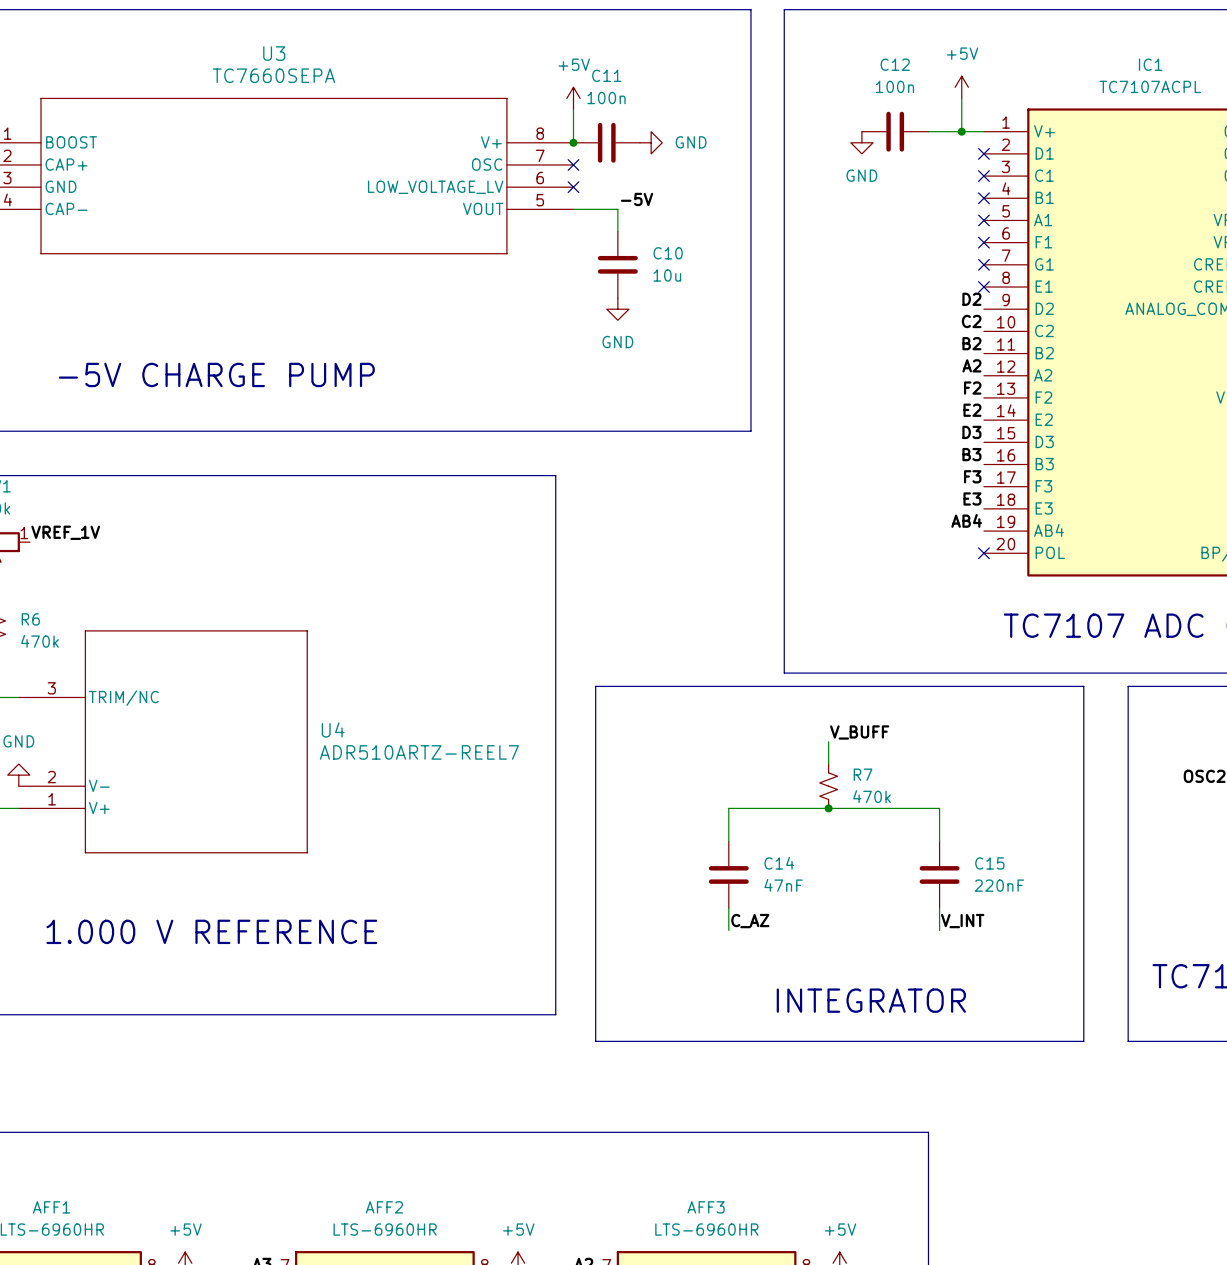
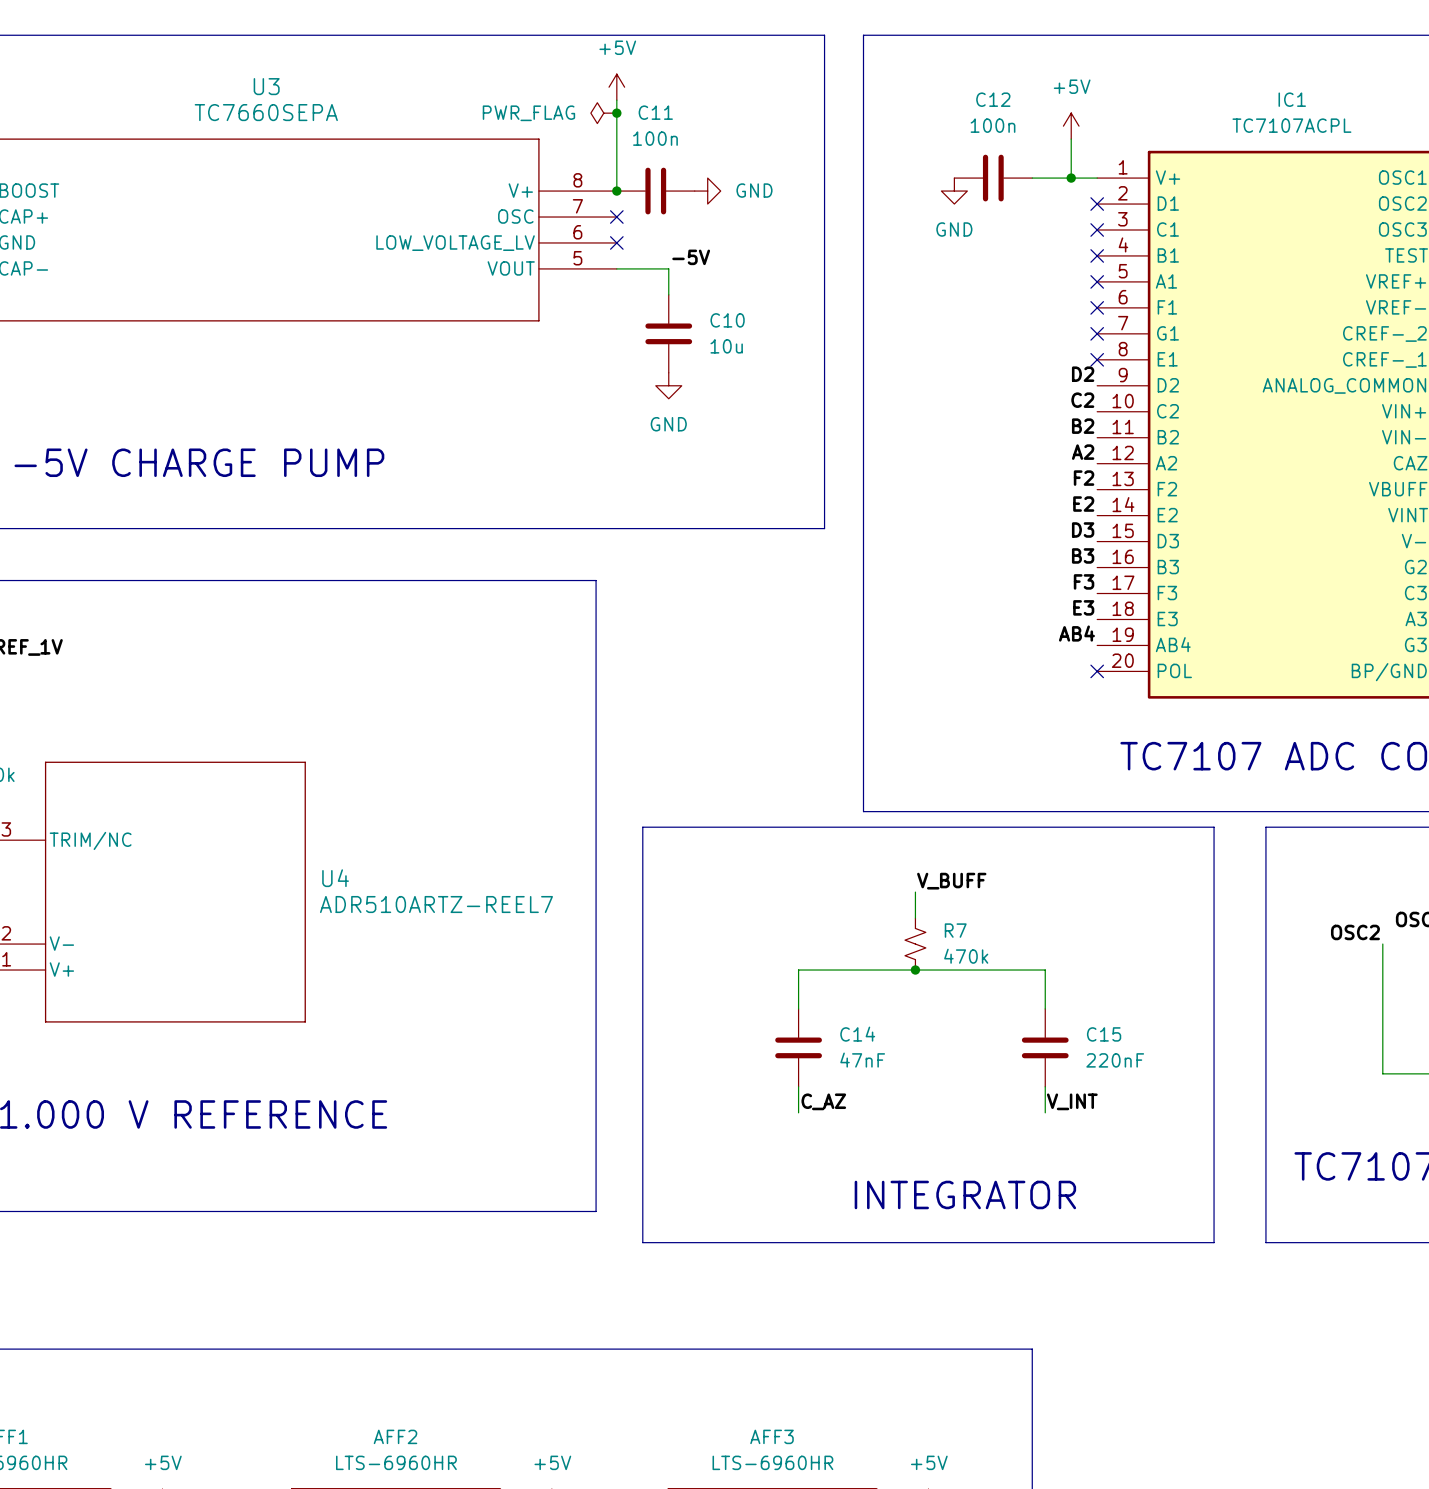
power symbol: none -> PWR_FLAG (603, 113)
junction: none -> (616, 113)
power symbol position: +5V (573, 98) -> +5V (616, 87)

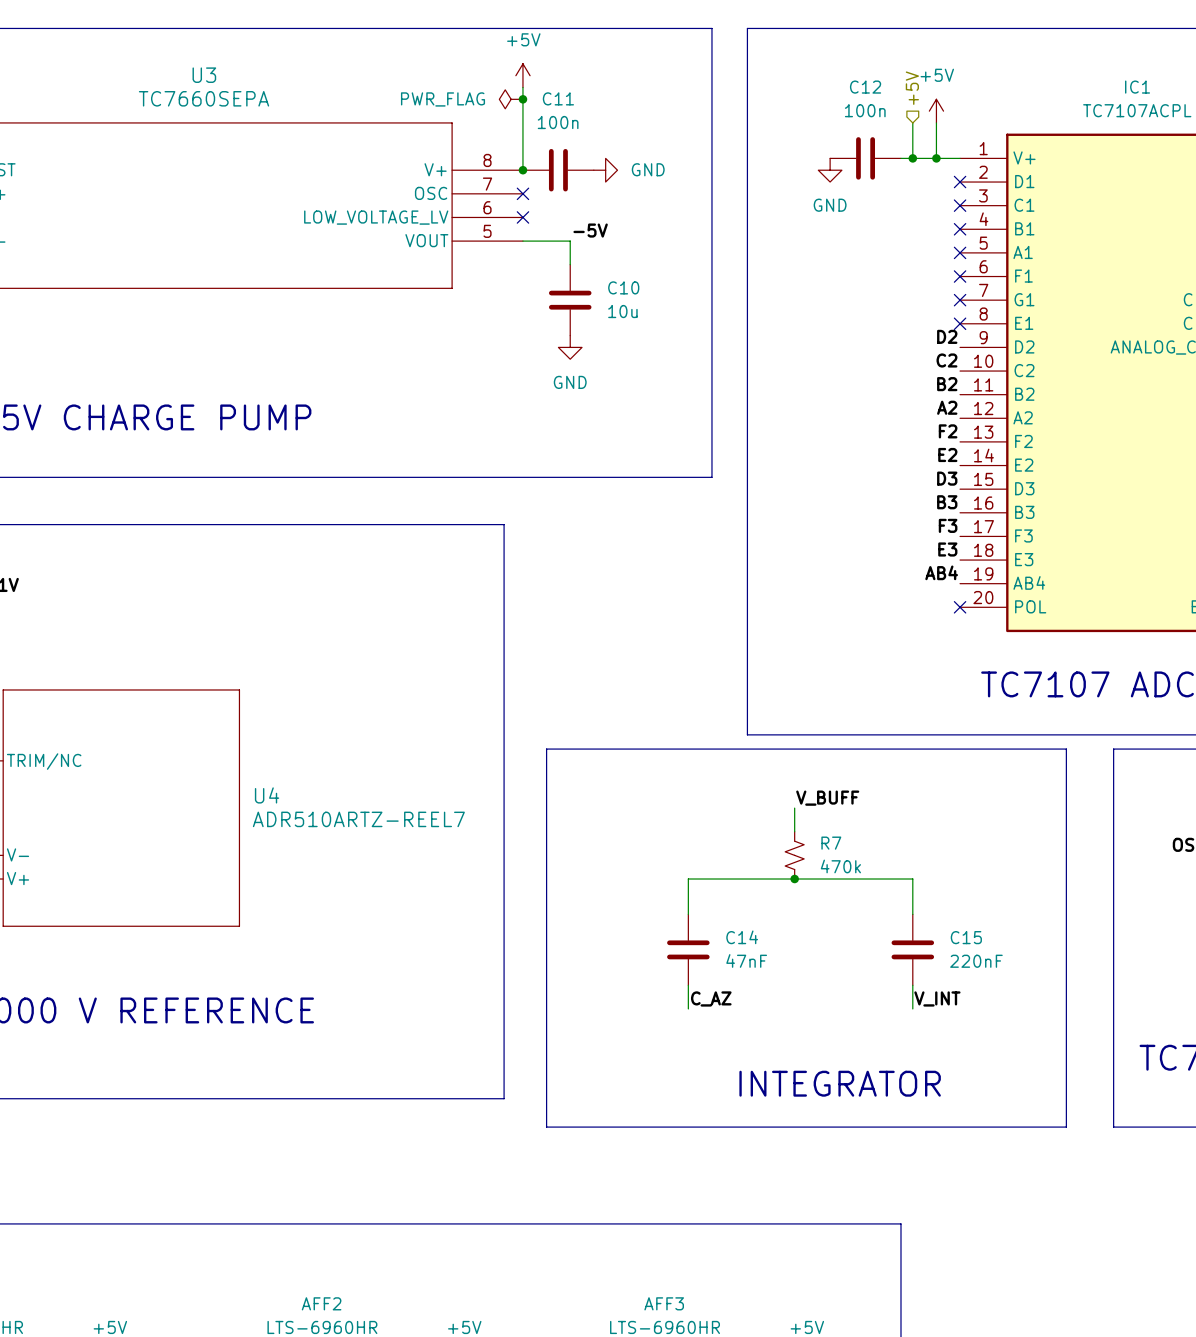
hierarchical label: none -> +5V (912, 88)
wire: none -> (912, 122) (912, 158)
junction: none -> (912, 158)

